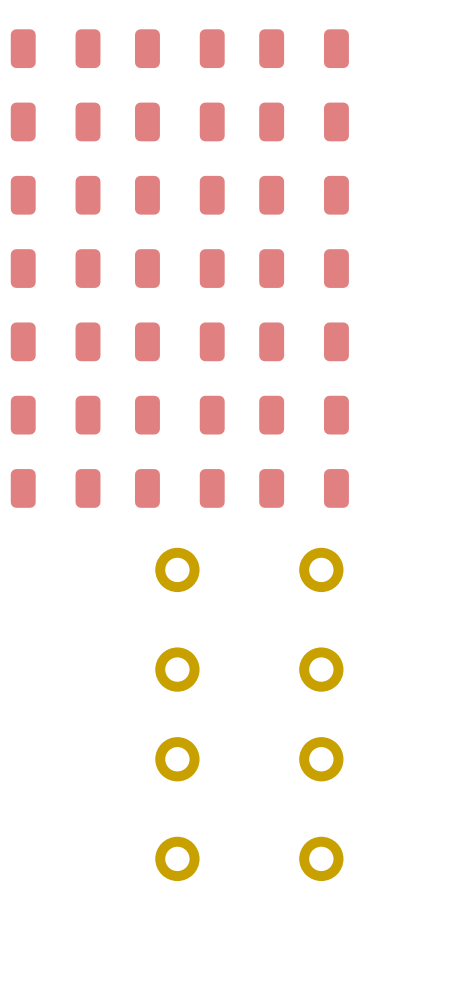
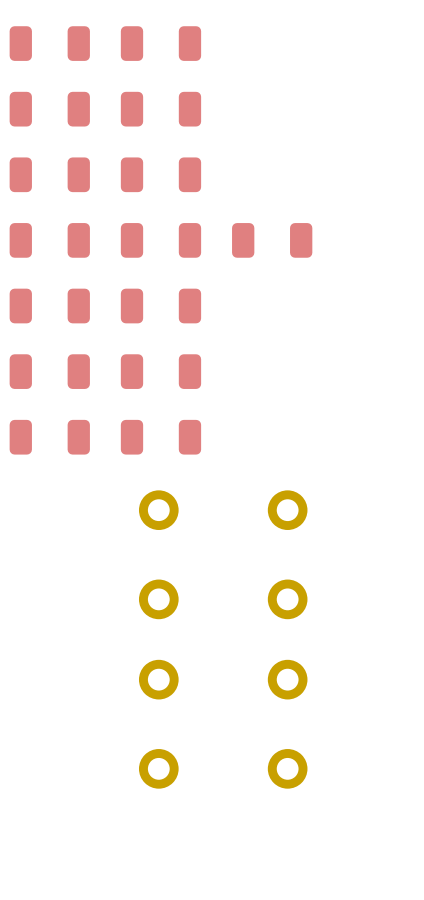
part: (304, 48) -> none
part: (304, 121) -> none
part: (304, 195) -> none
part: (304, 341) -> none
part: (304, 415) -> none
part: (304, 488) -> none

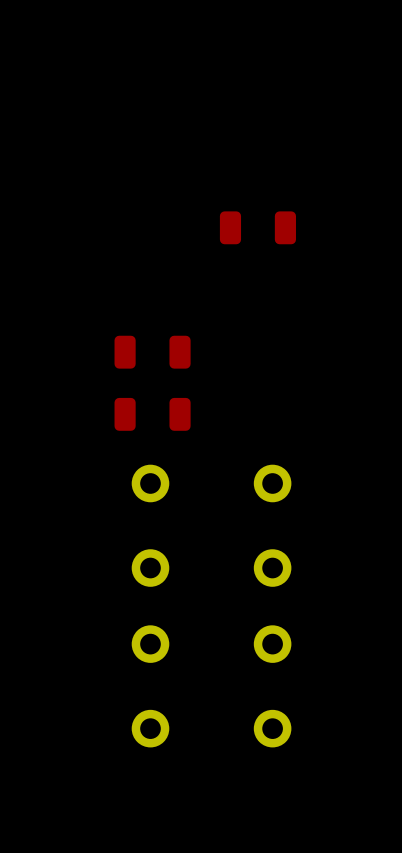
part: (49, 43) -> none
part: (160, 43) -> none
part: (49, 109) -> none
part: (160, 109) -> none
part: (49, 174) -> none
part: (160, 174) -> none
part: (49, 240) -> none
part: (160, 240) -> none
part: (49, 306) -> none
part: (160, 306) -> none
part: (49, 371) -> none
part: (49, 437) -> none

